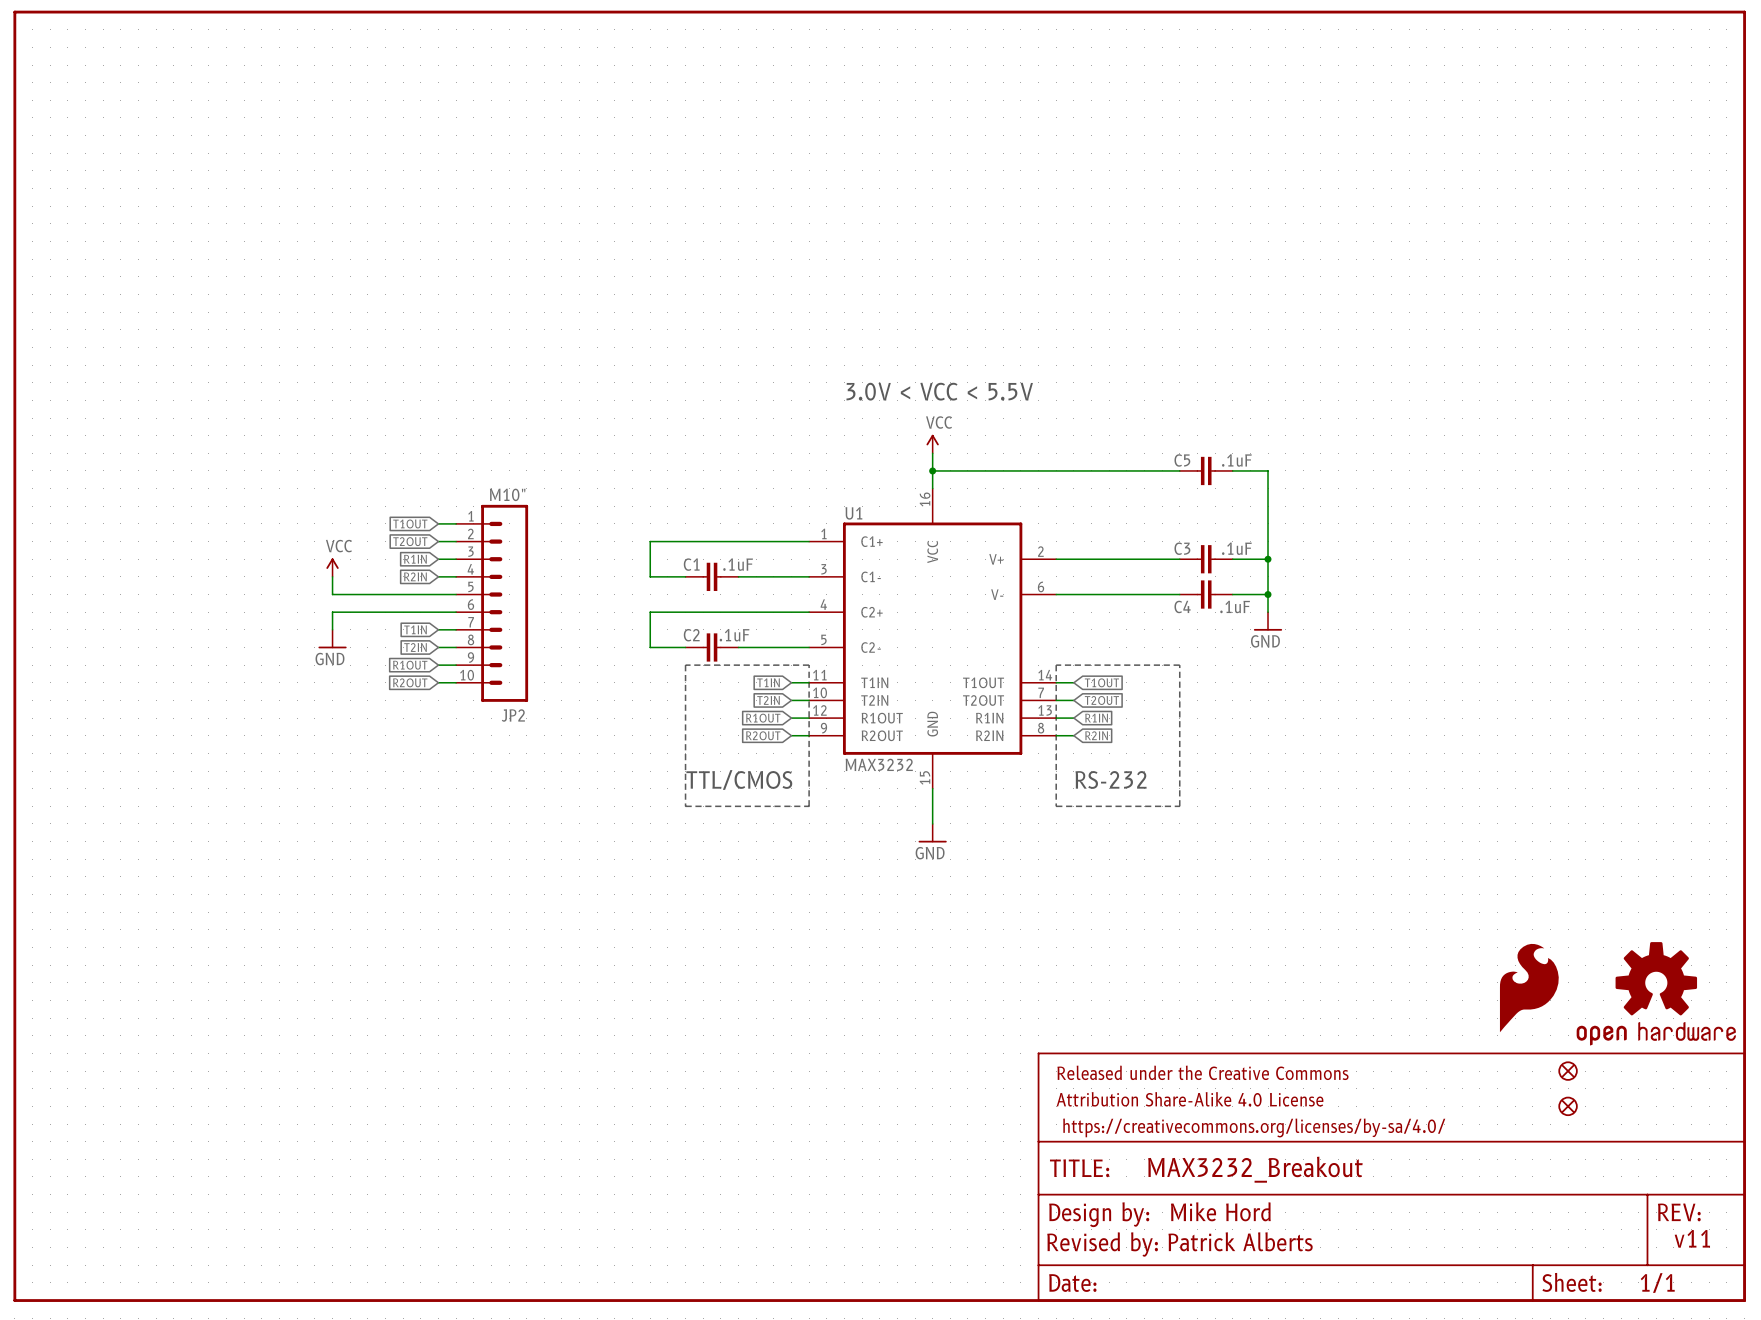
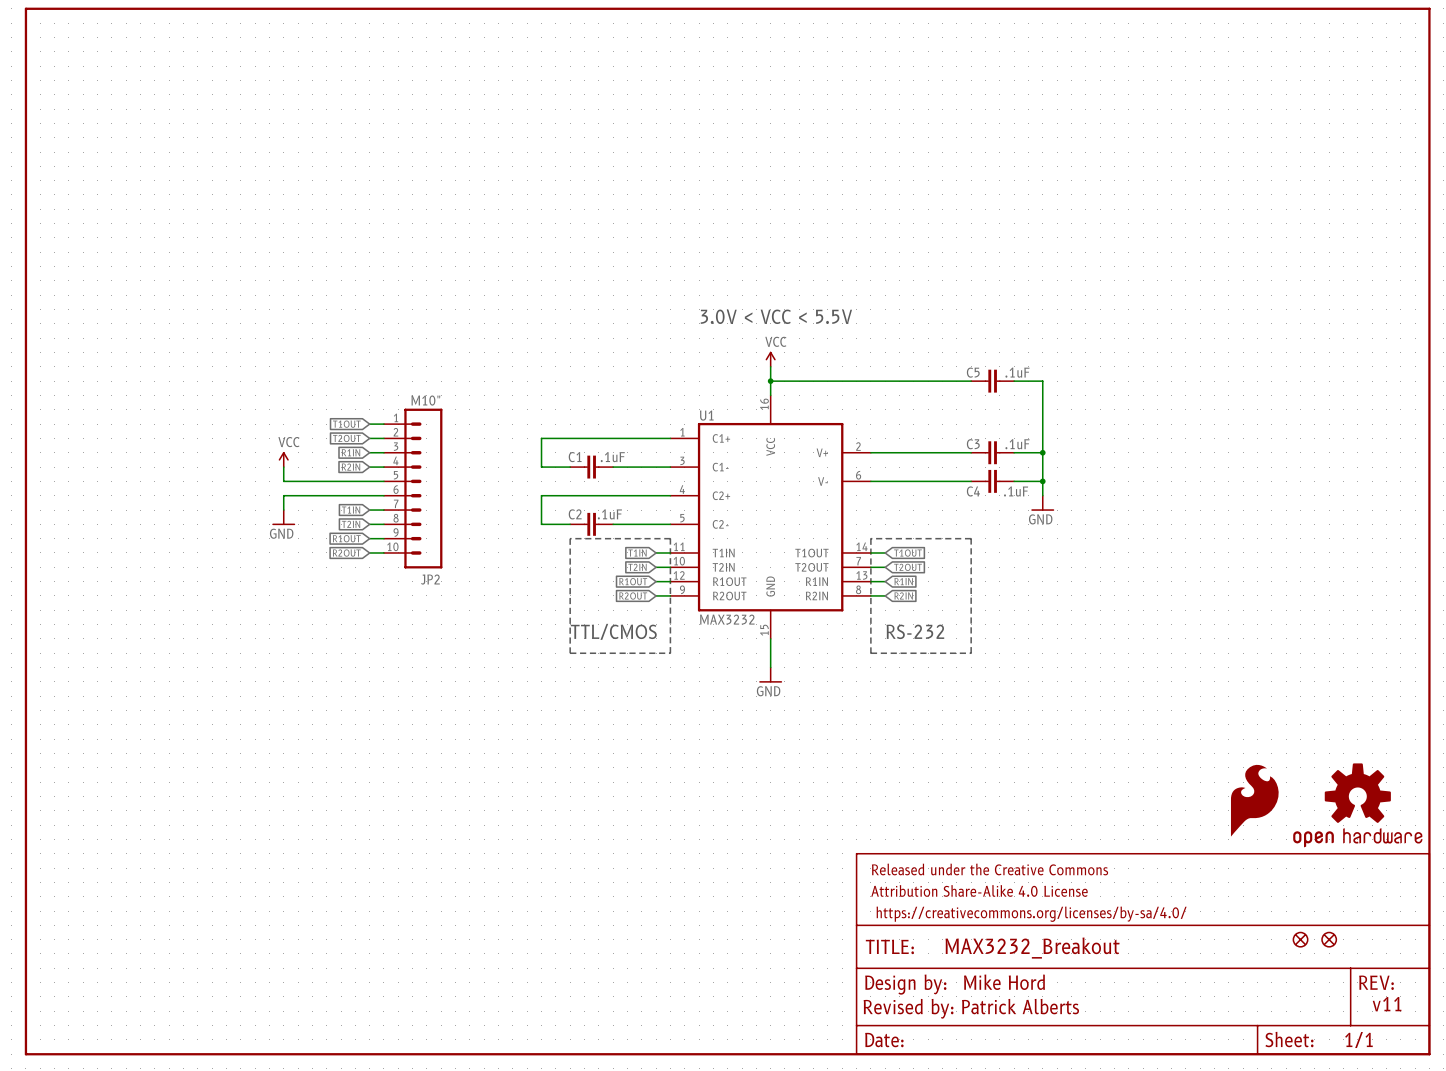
part: (1568, 1071) -> none
part: (1568, 1106) -> none
part: none -> (1300, 939)
part: none -> (1329, 939)

